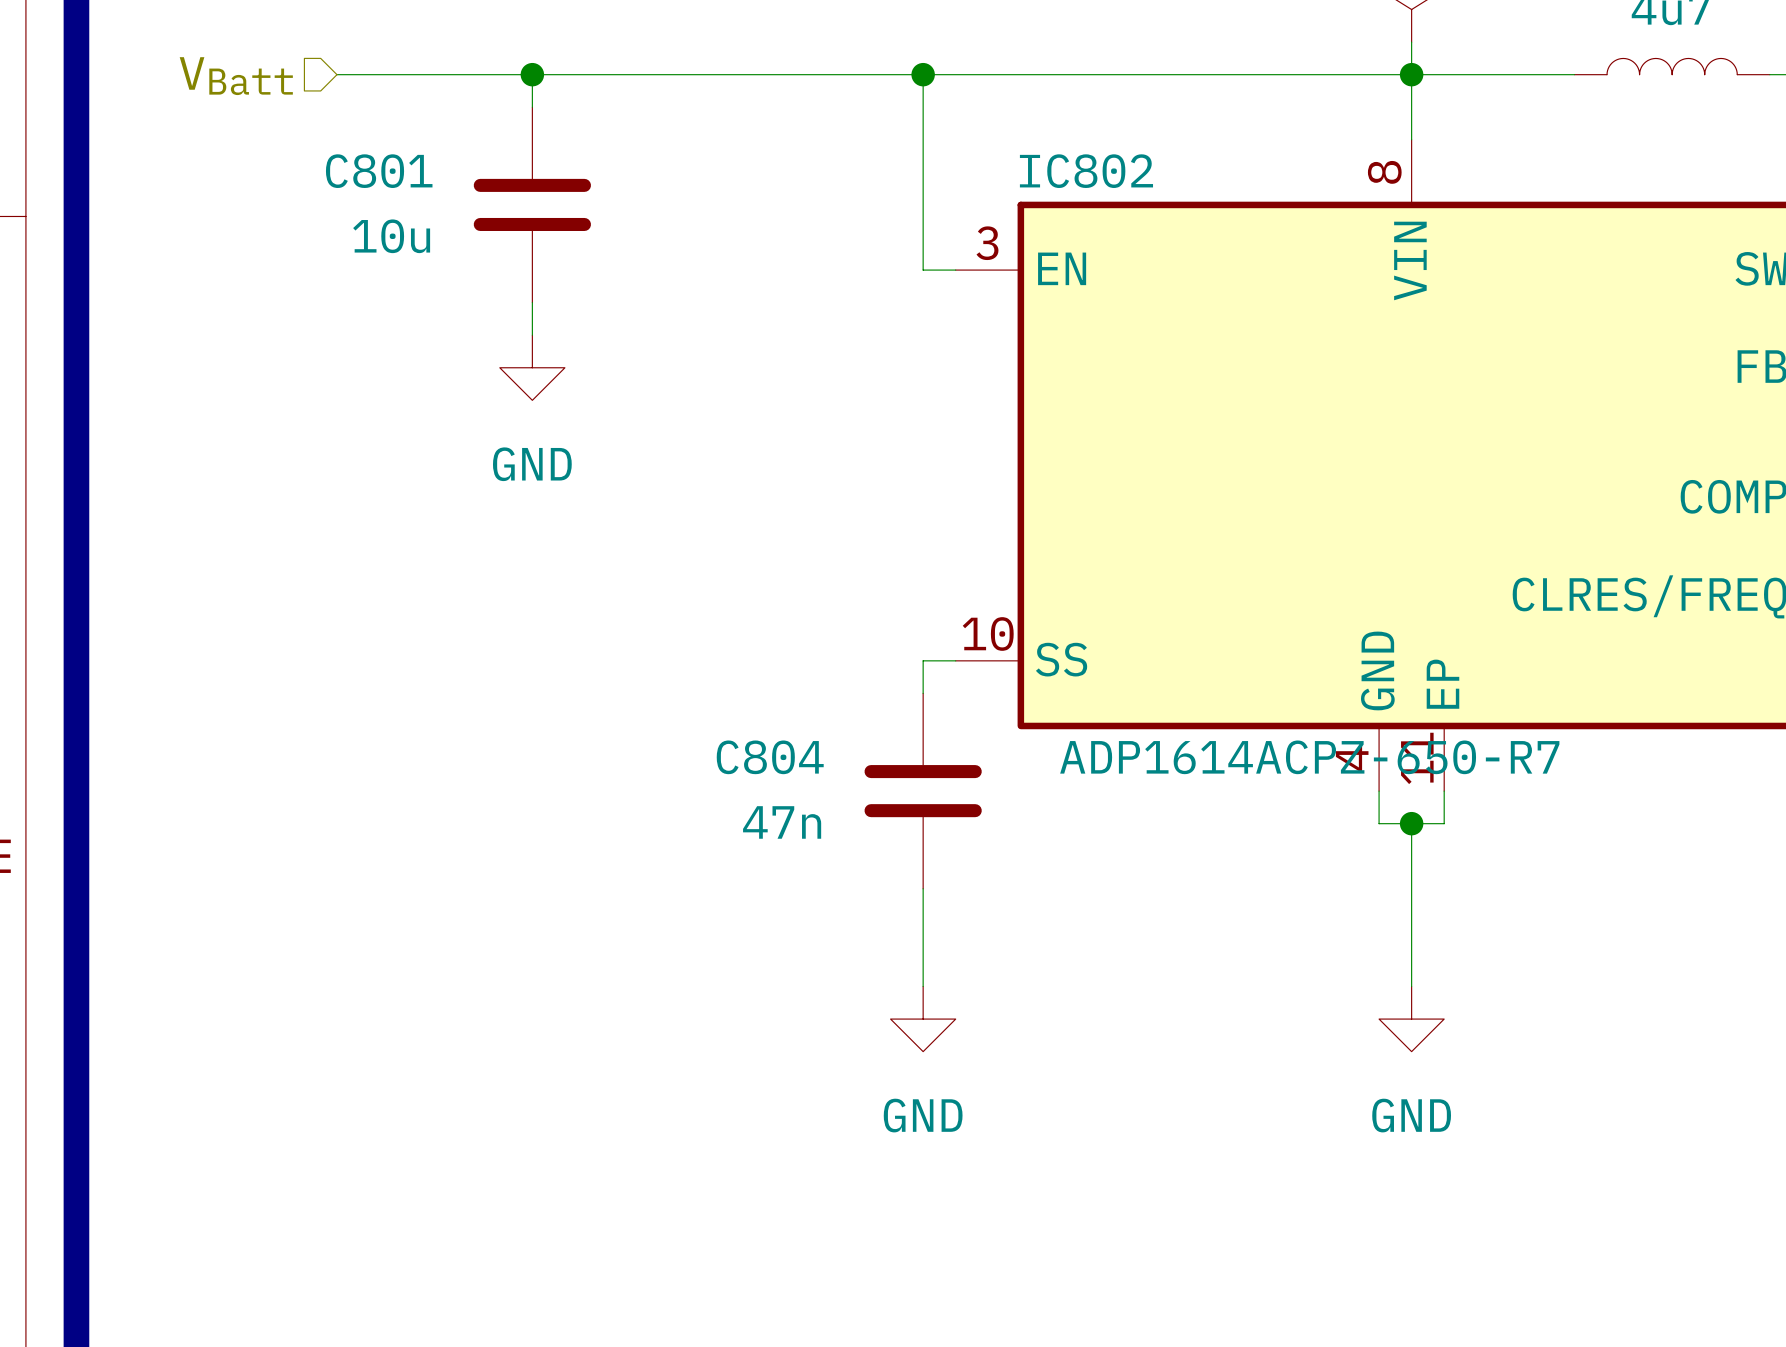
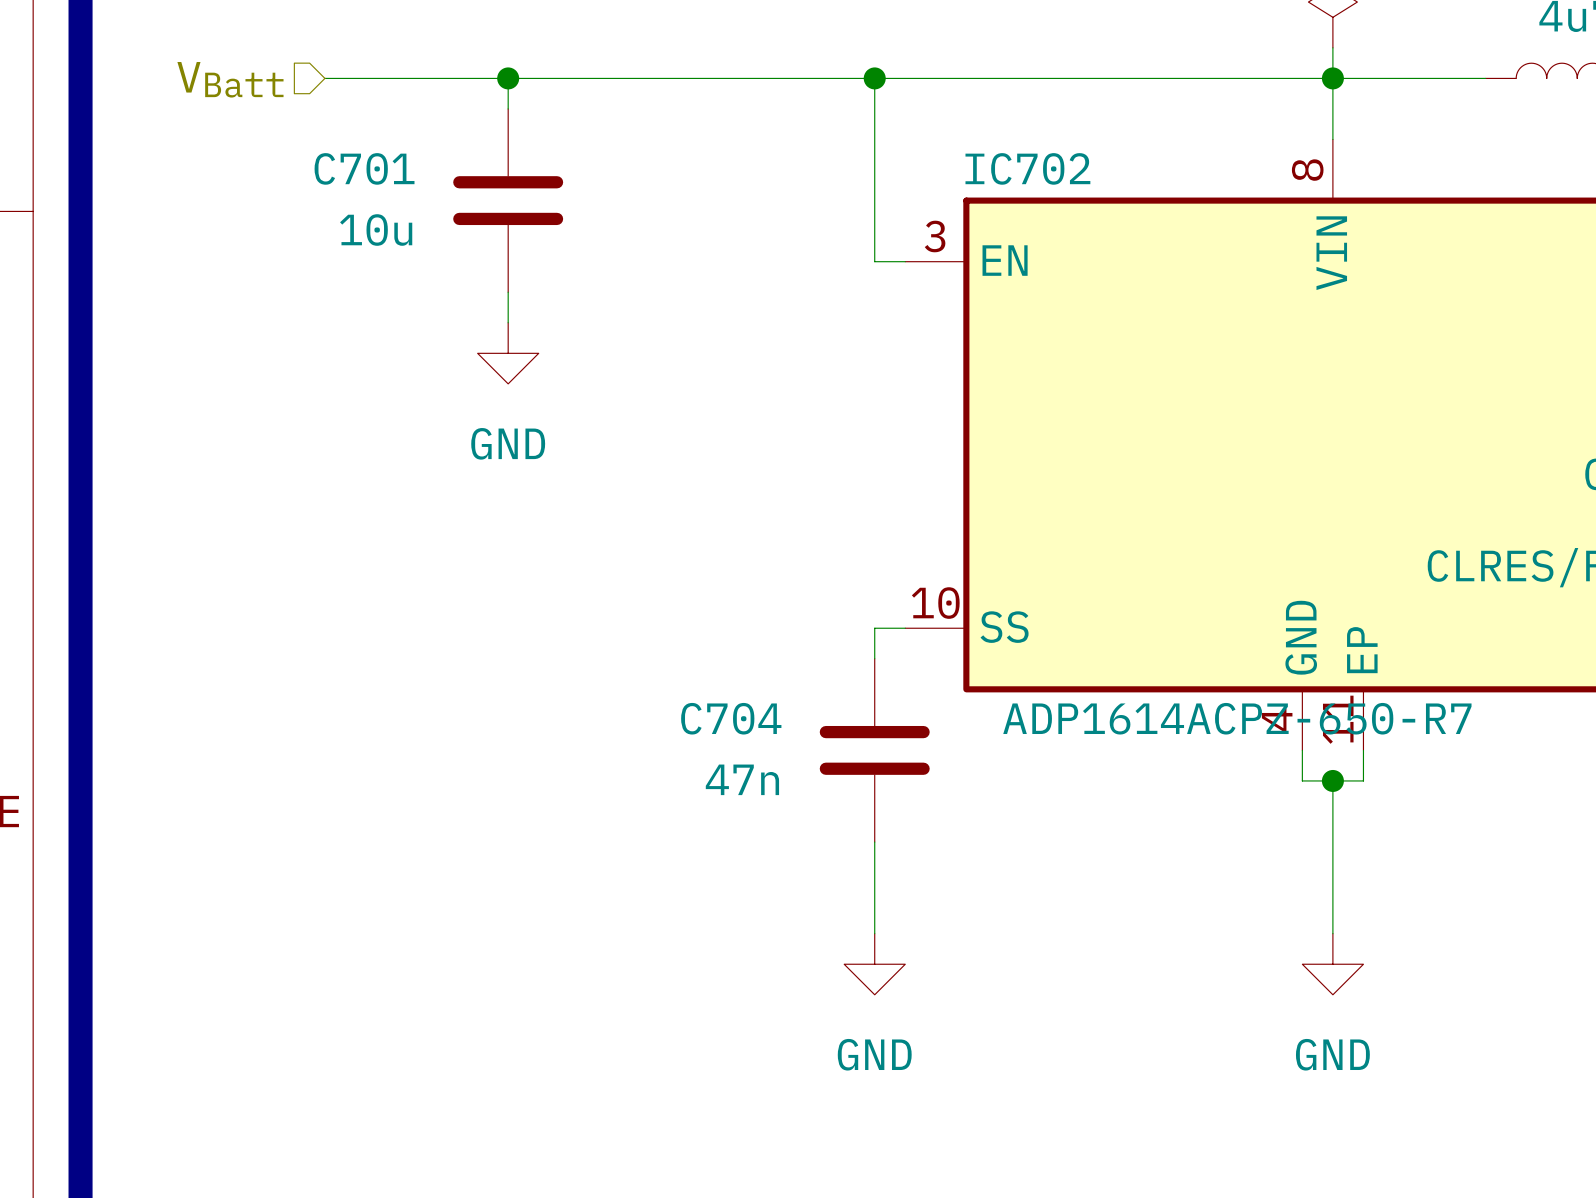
C801 name: C801 (379, 171) -> C701 (364, 168)
IC802 name: IC802 (1086, 171) -> IC702 (1027, 168)
C804 name: C804 (770, 757) -> C704 (731, 718)

